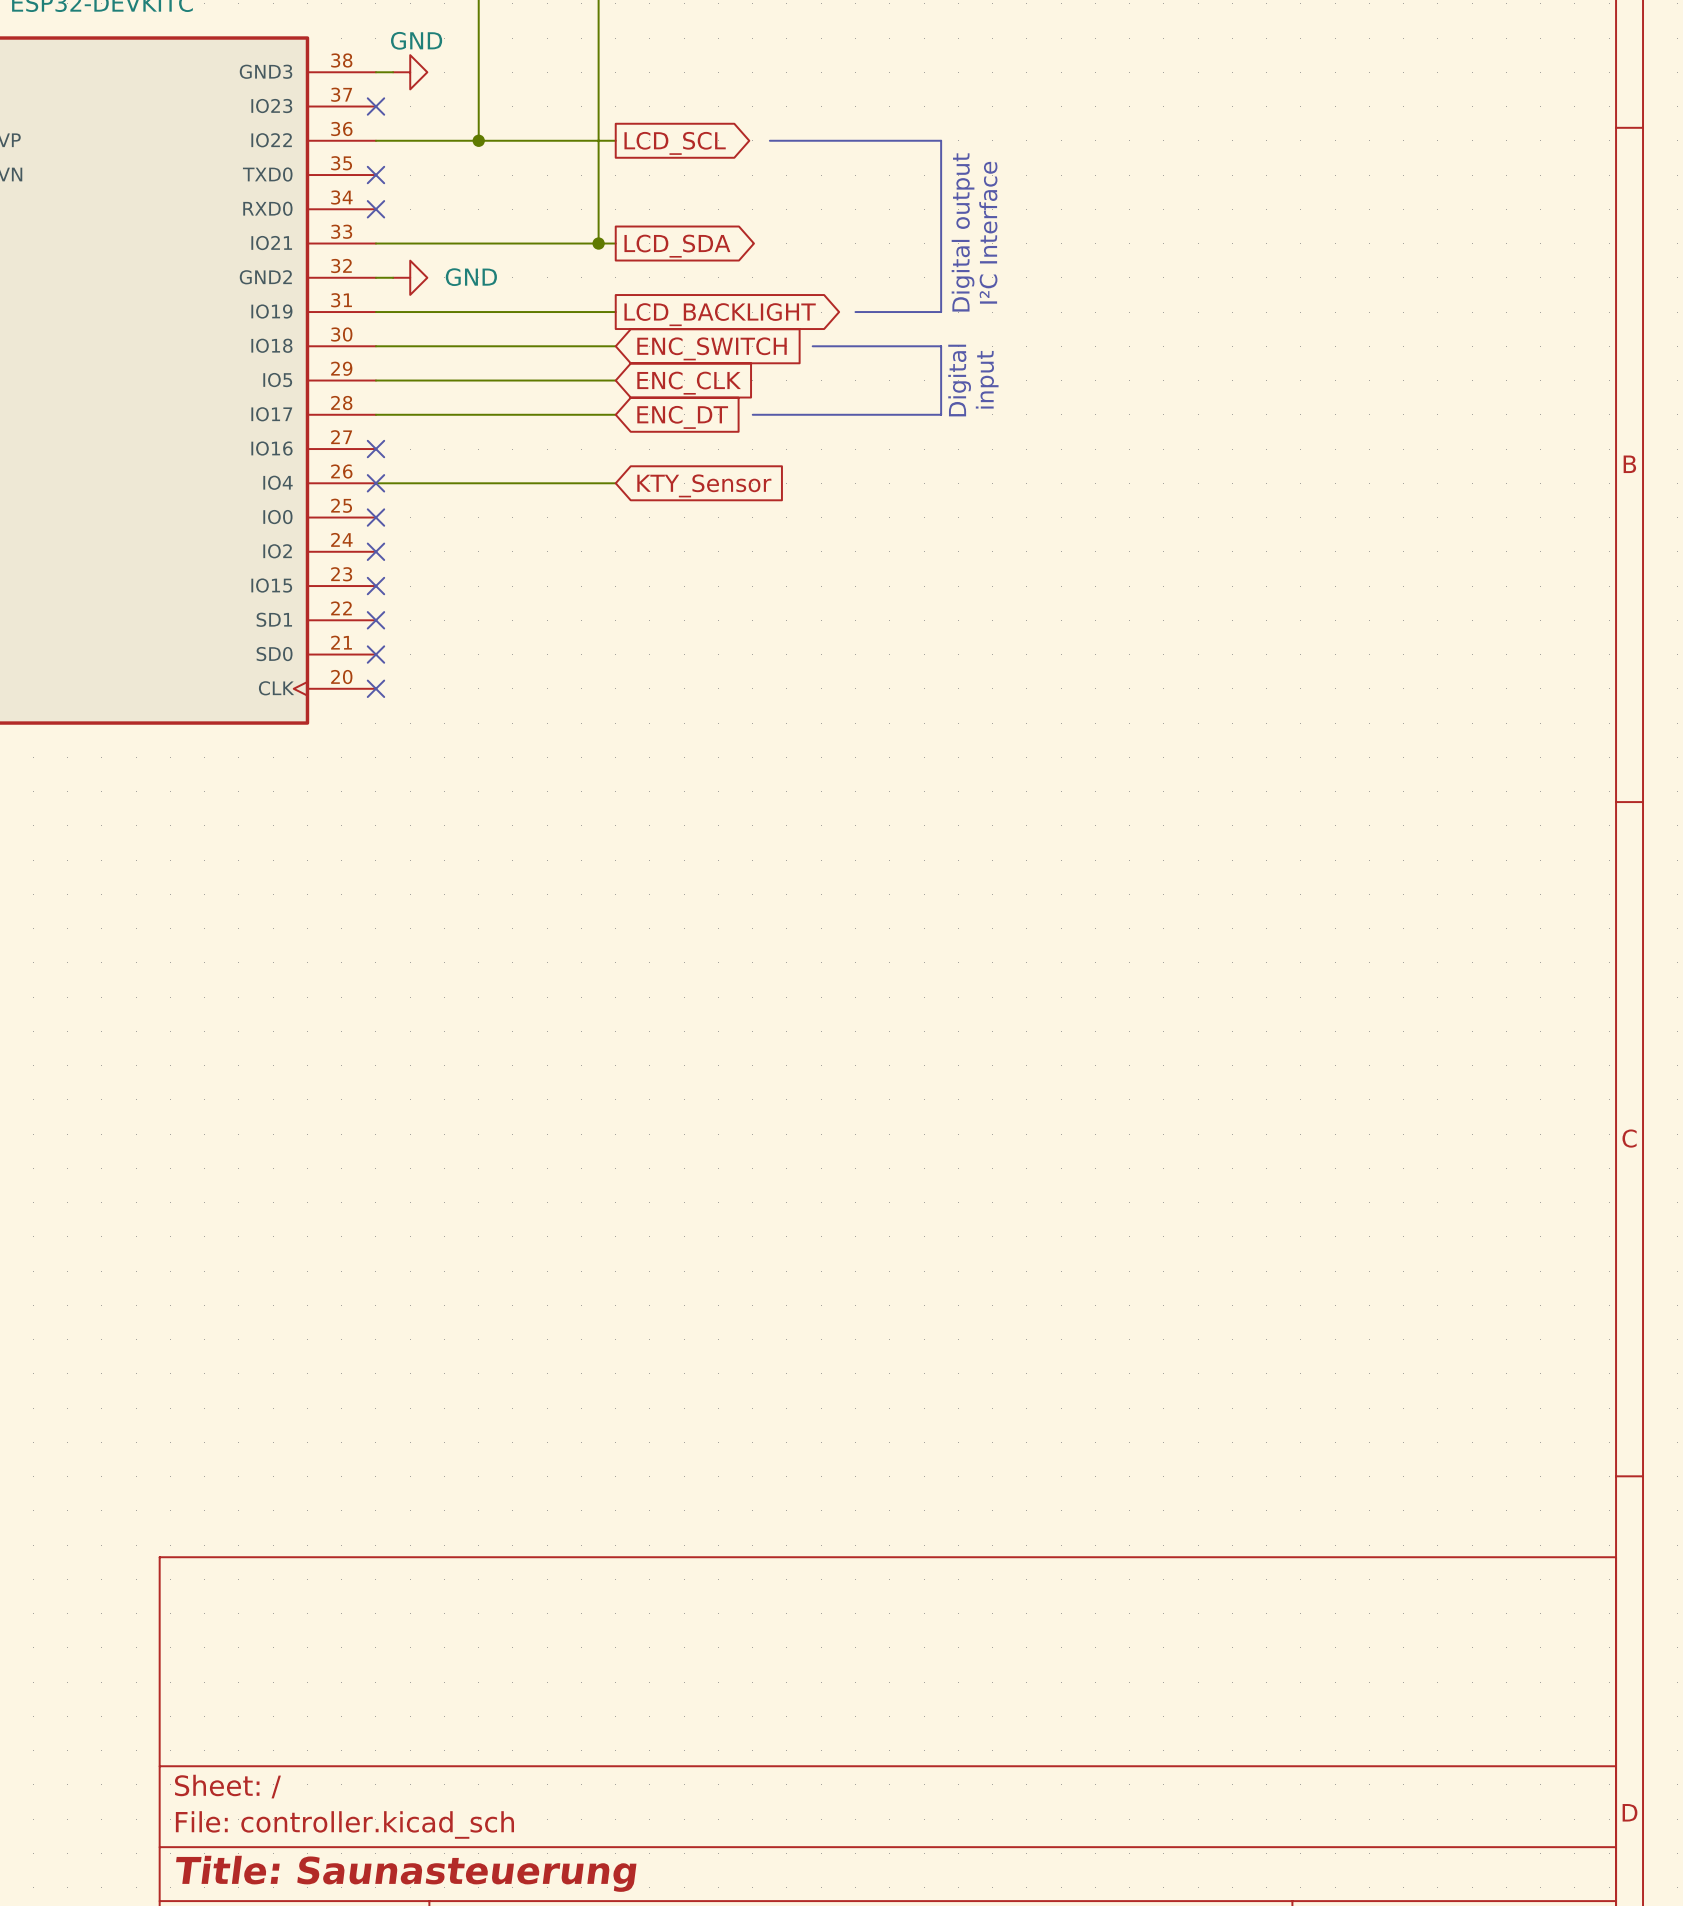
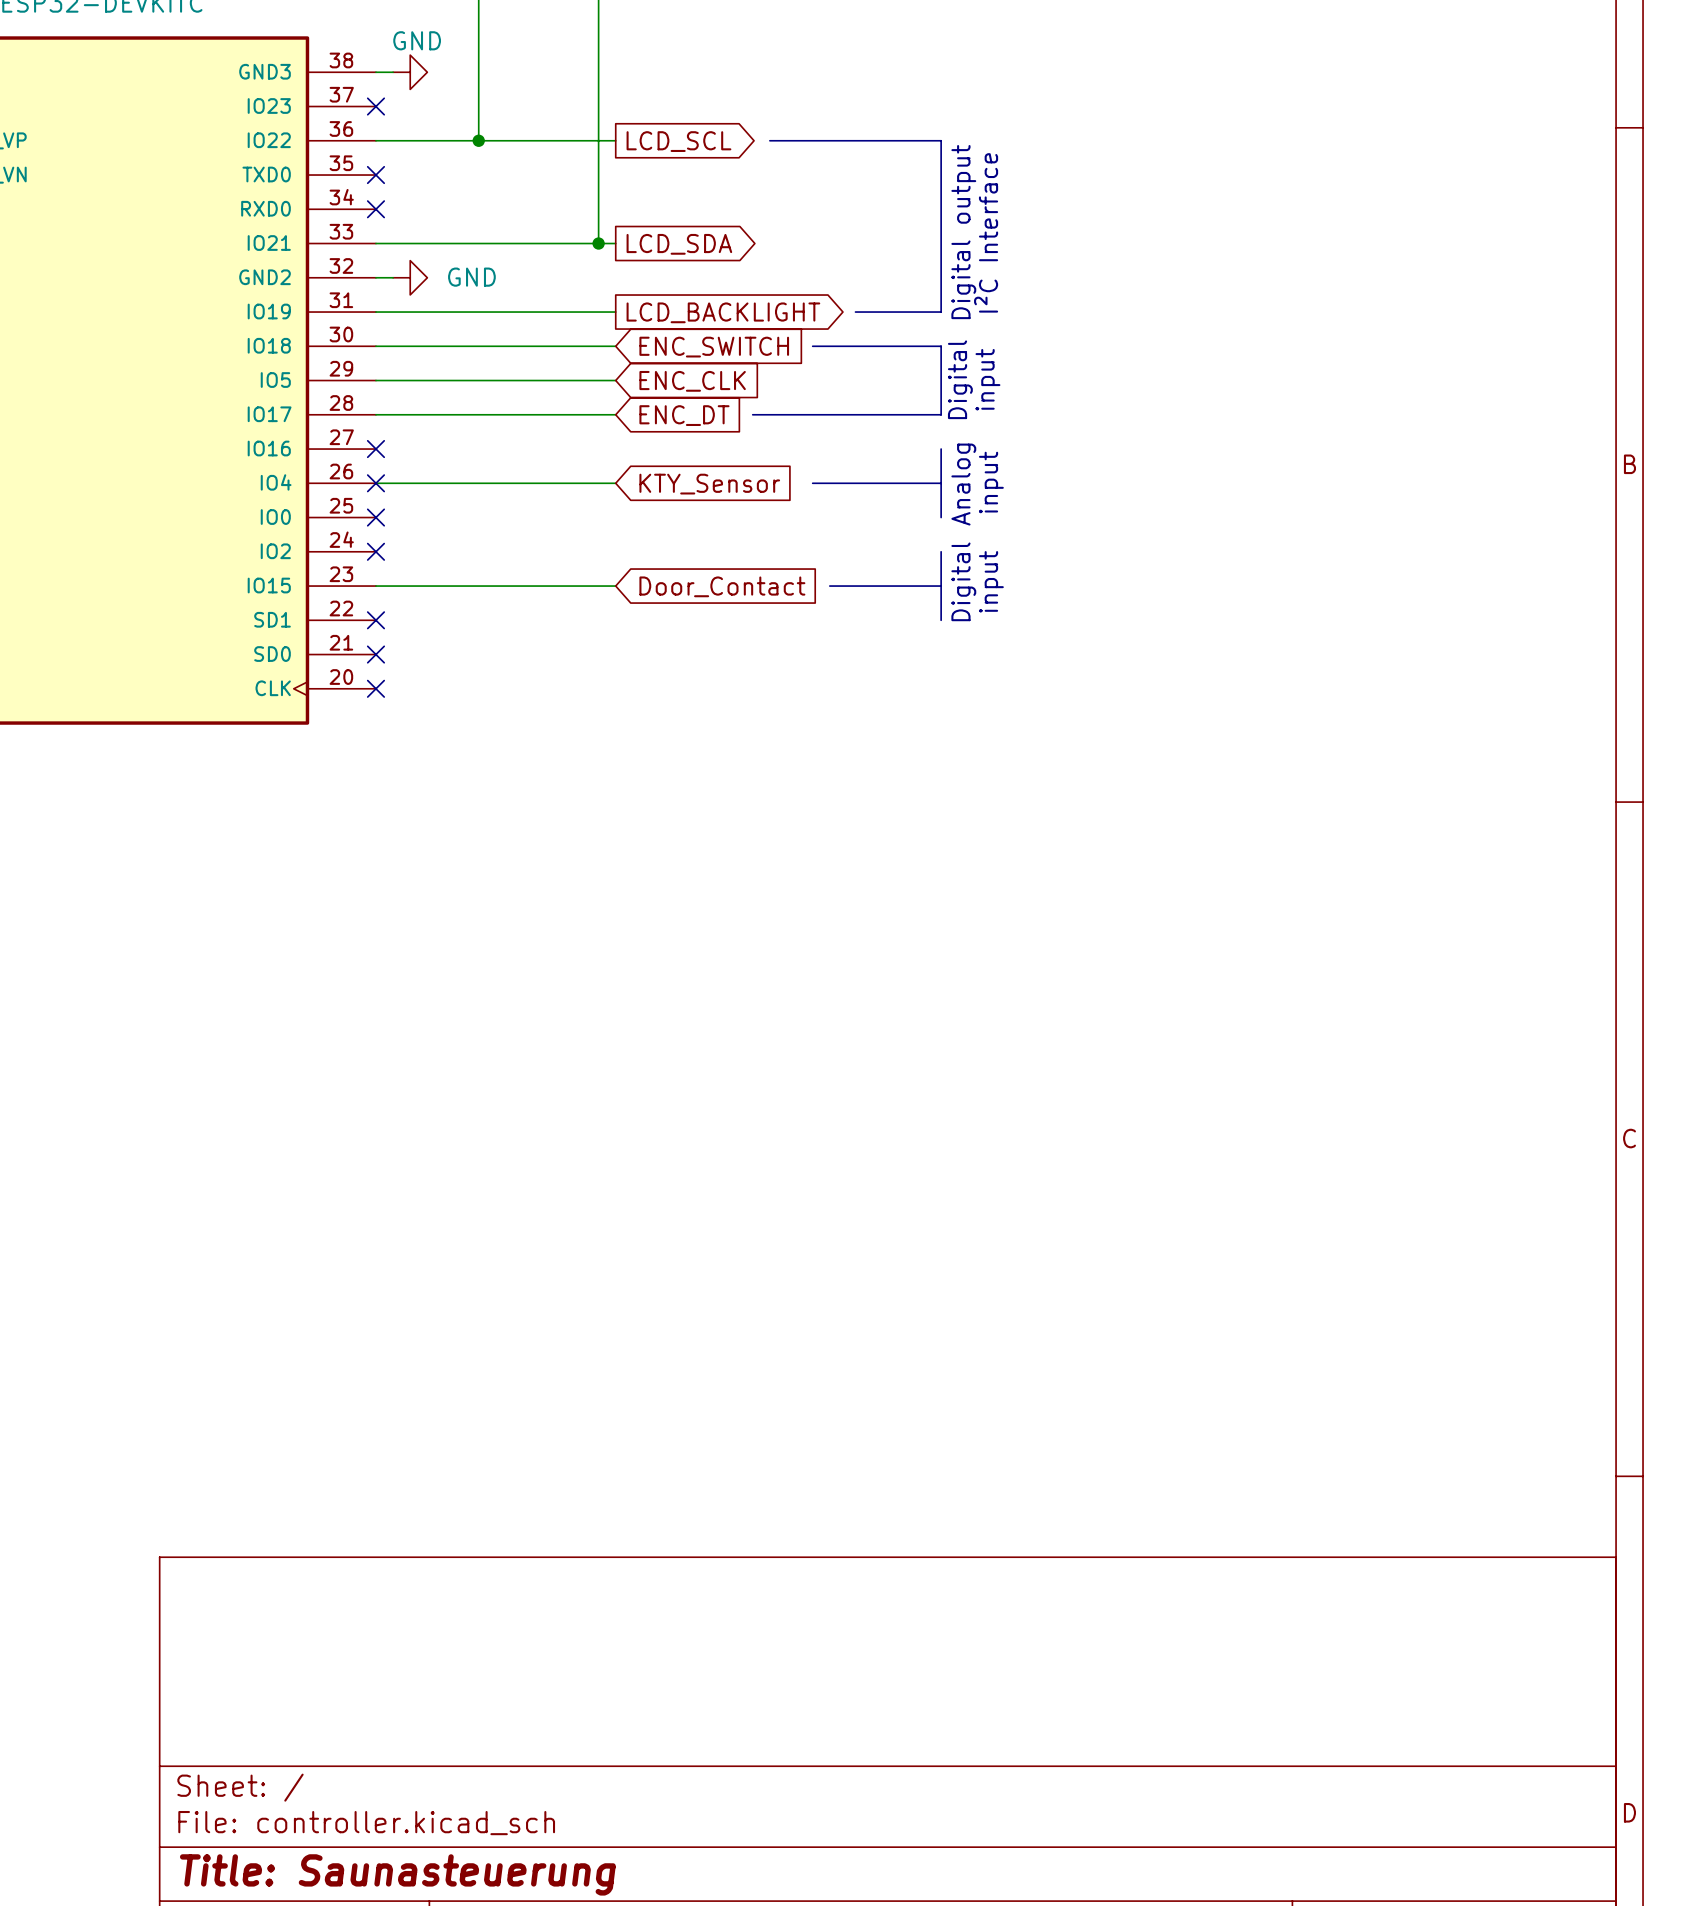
line: none -> (941, 449) (941, 517)
text: none -> input (991, 482)
line: none -> (812, 483) (941, 483)
text: none -> Analog (963, 484)
line: none -> (941, 551) (941, 620)
text: none -> input (991, 581)
text: none -> Digital (963, 581)
wire: none -> (375, 586) (615, 586)
no-connect mark: (375, 586) -> none
line: none -> (829, 586) (941, 586)
global label: none -> Door_Contact (722, 586)

